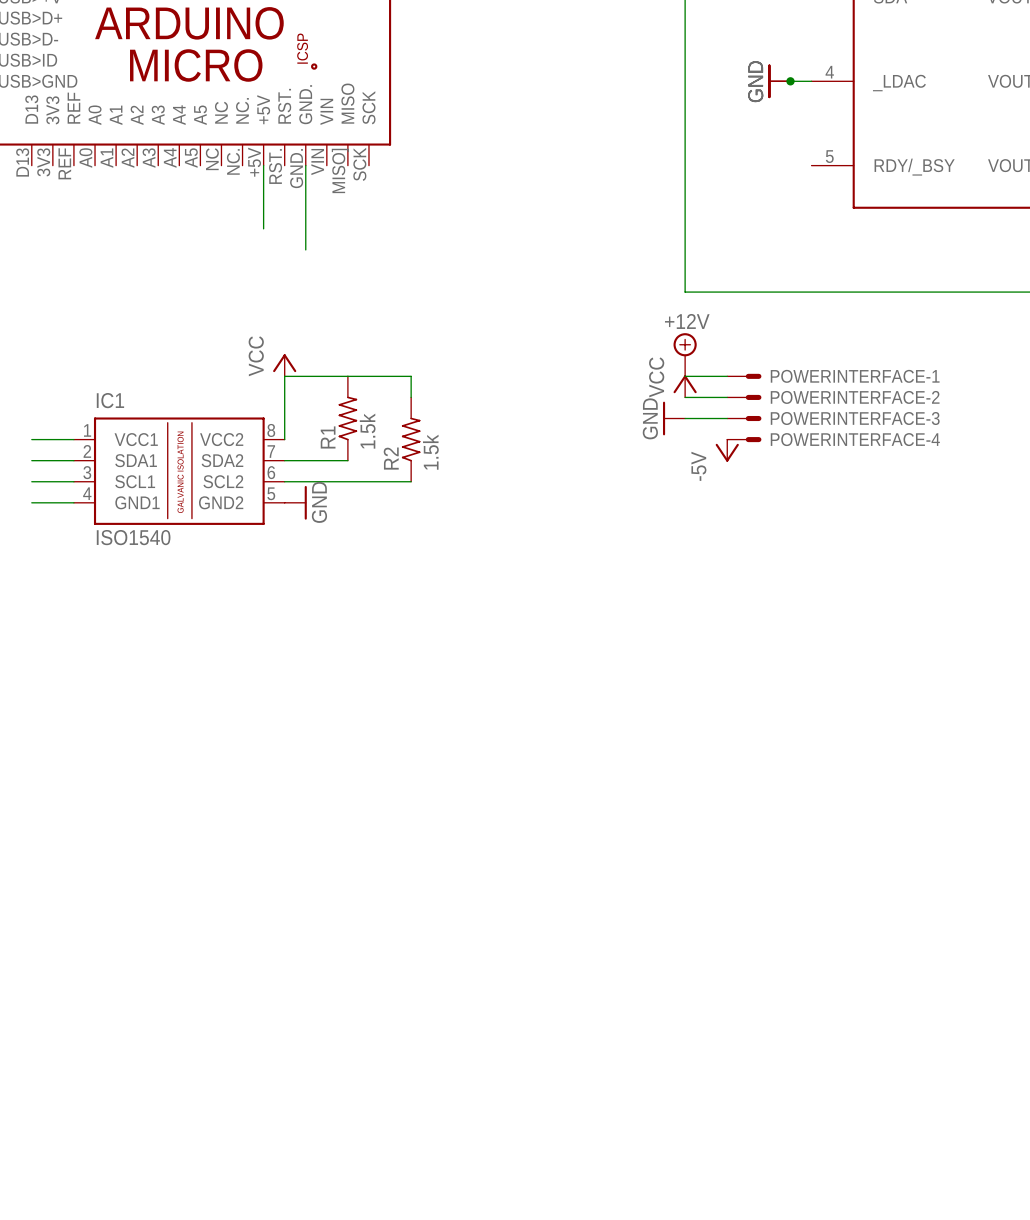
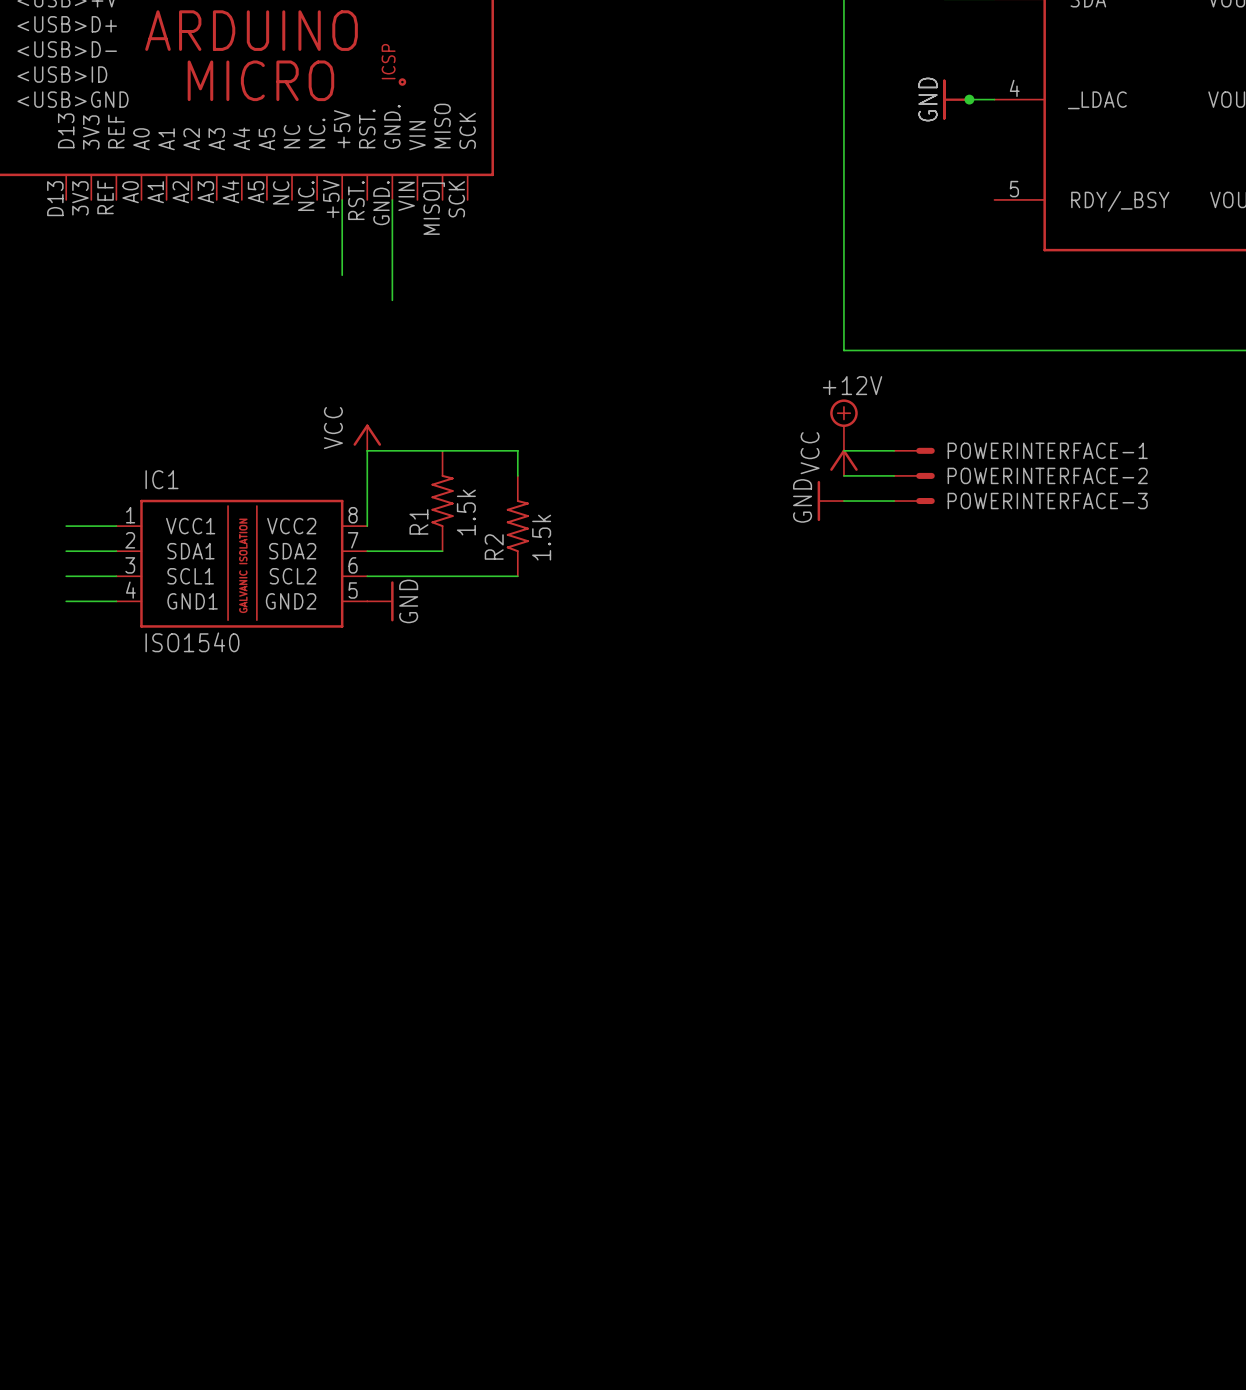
POWERINTERFACE-4: (744, 439) -> none
power symbol: -5V (727, 450) -> none

